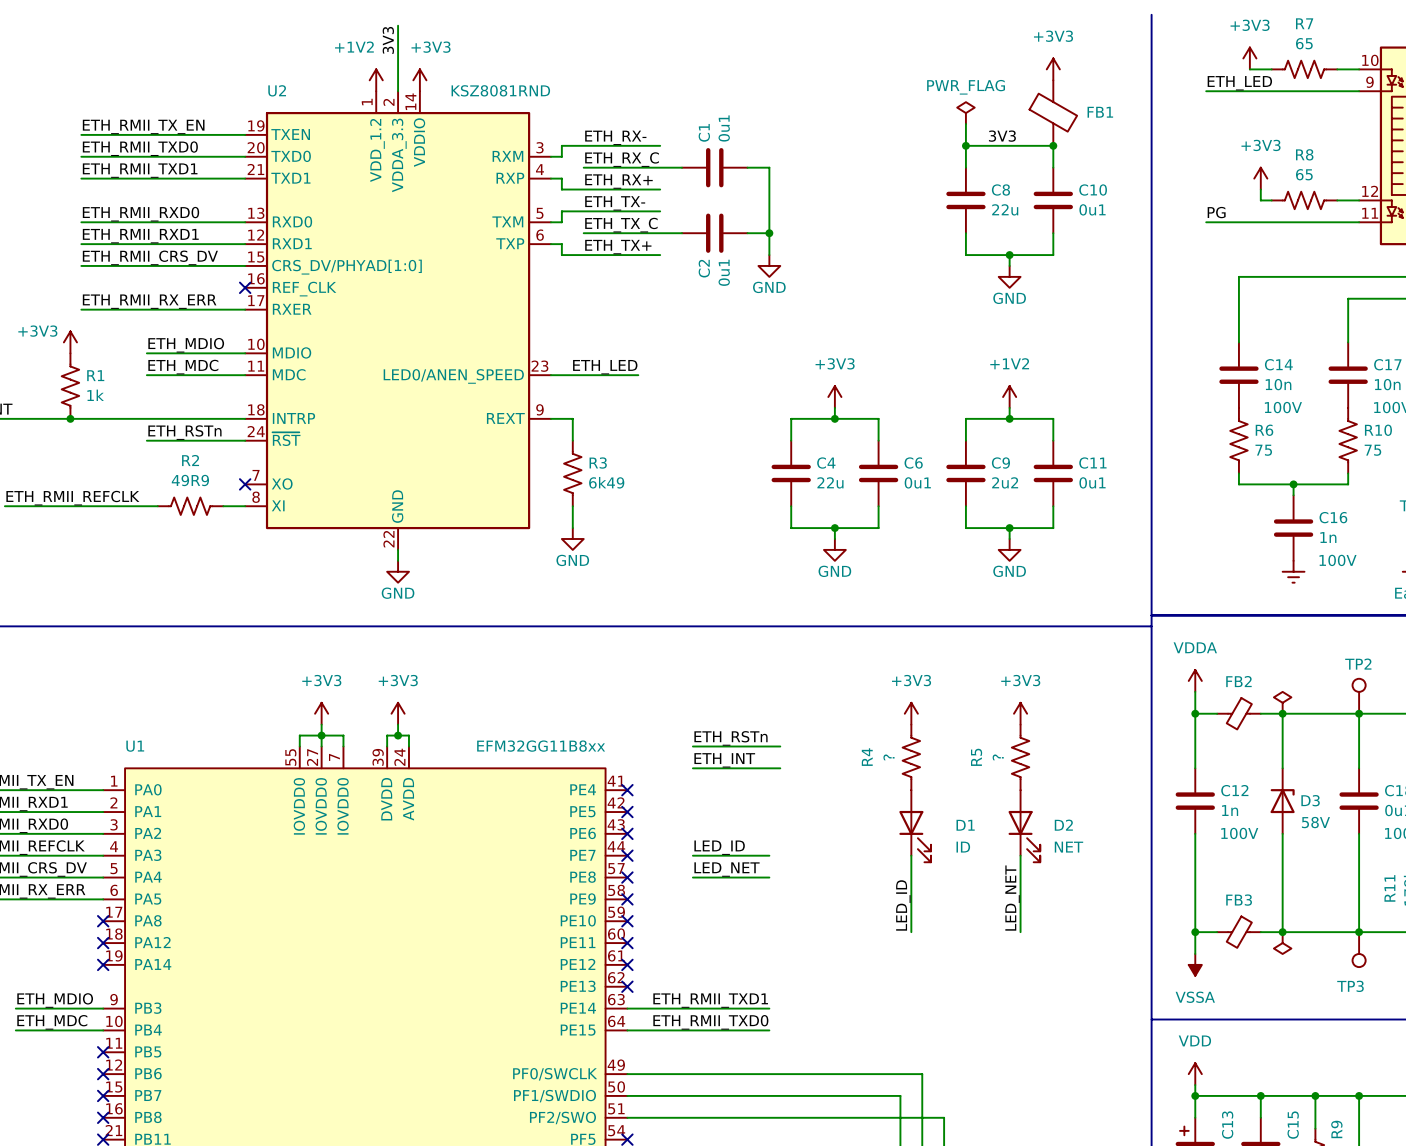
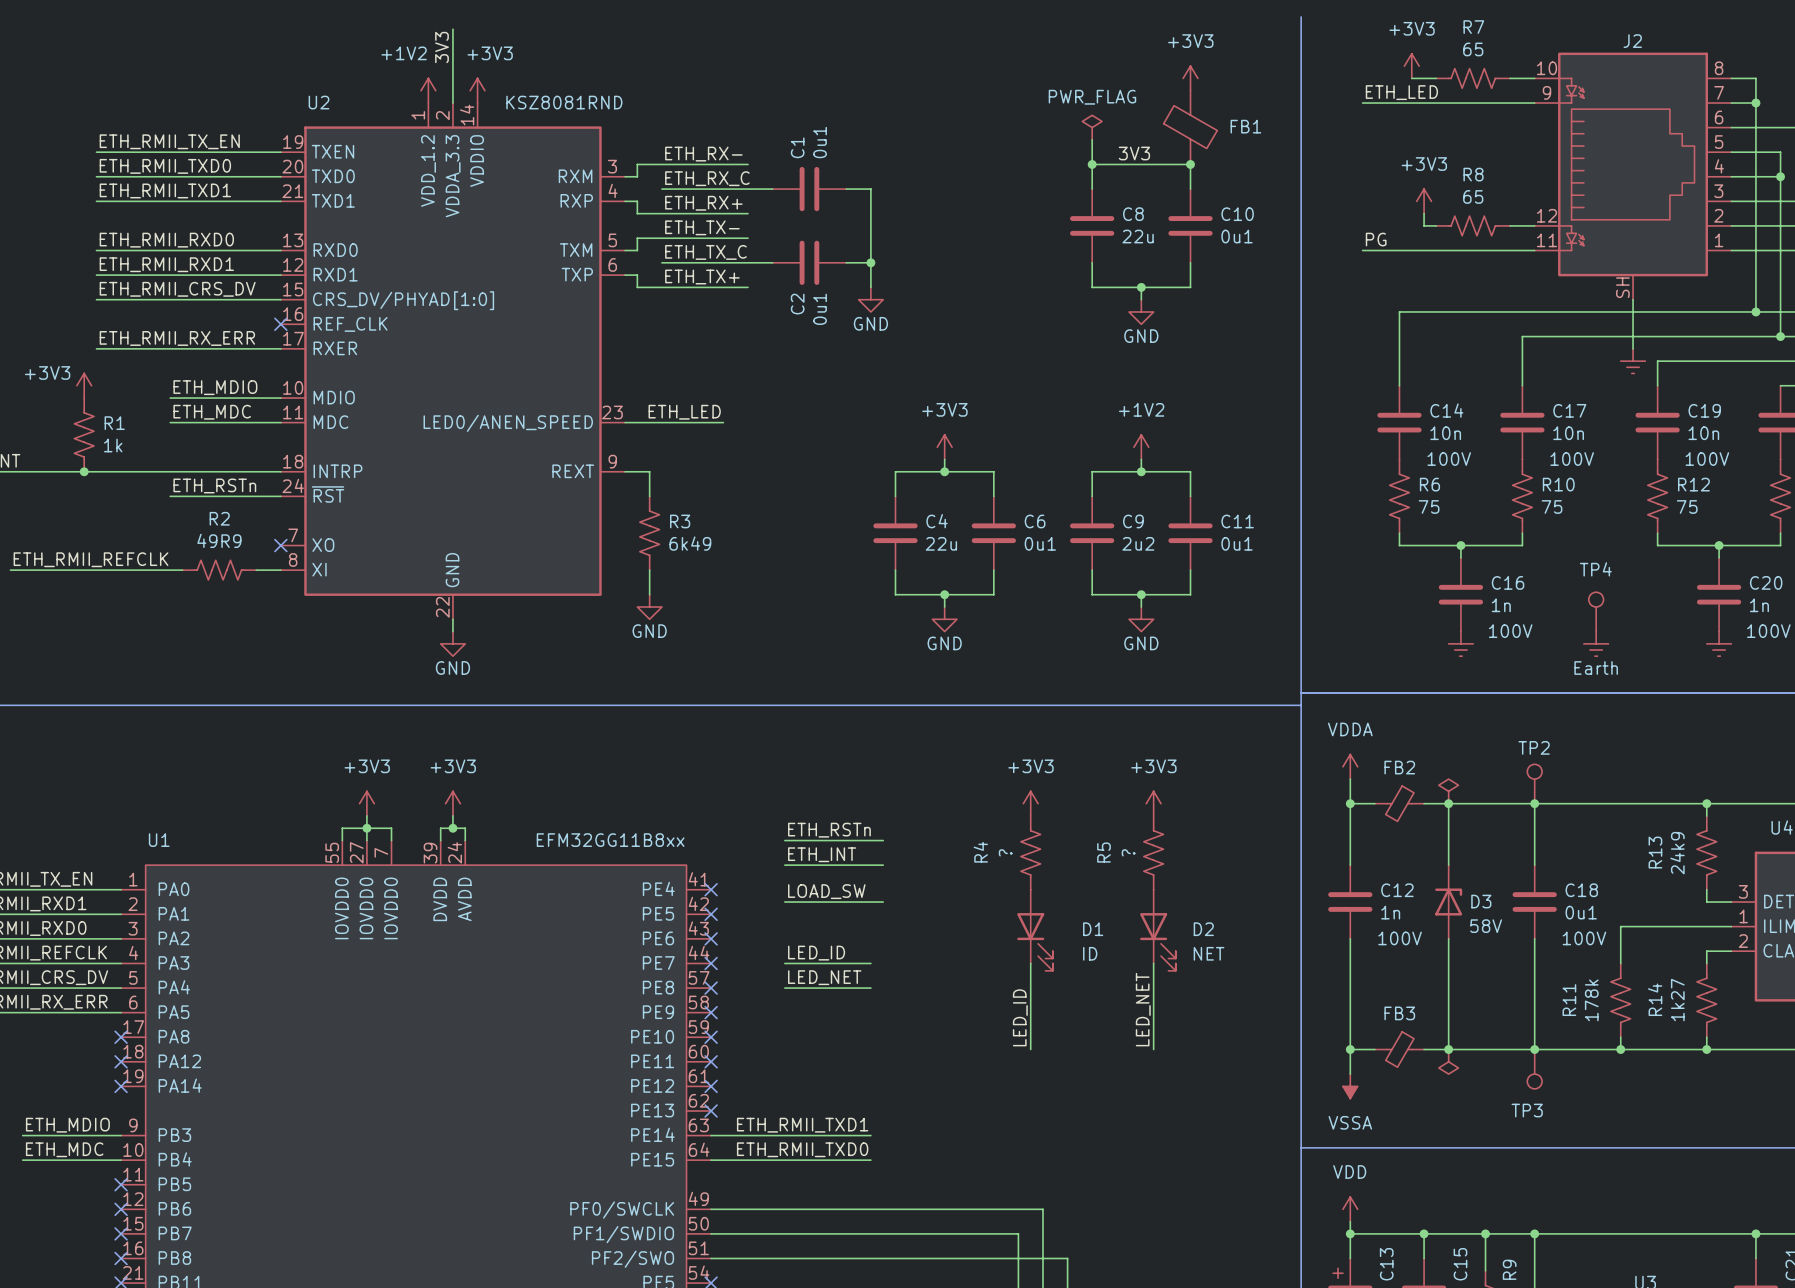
label: none -> LOAD_SW (826, 891)
wire: none -> (784, 902) (883, 902)

